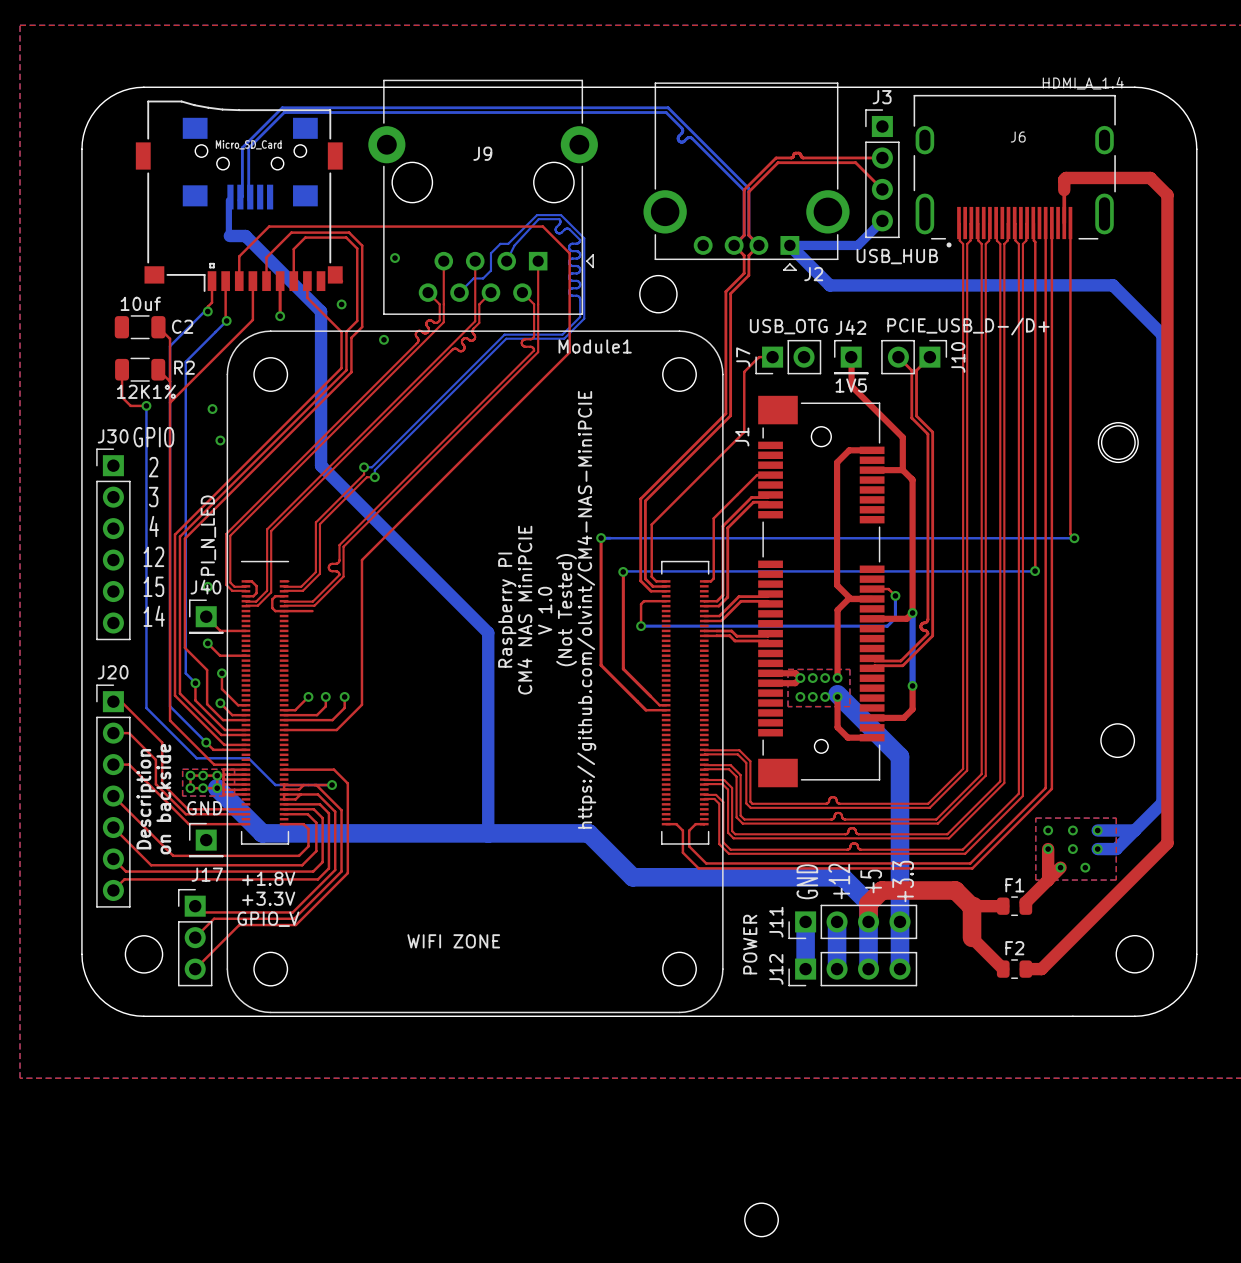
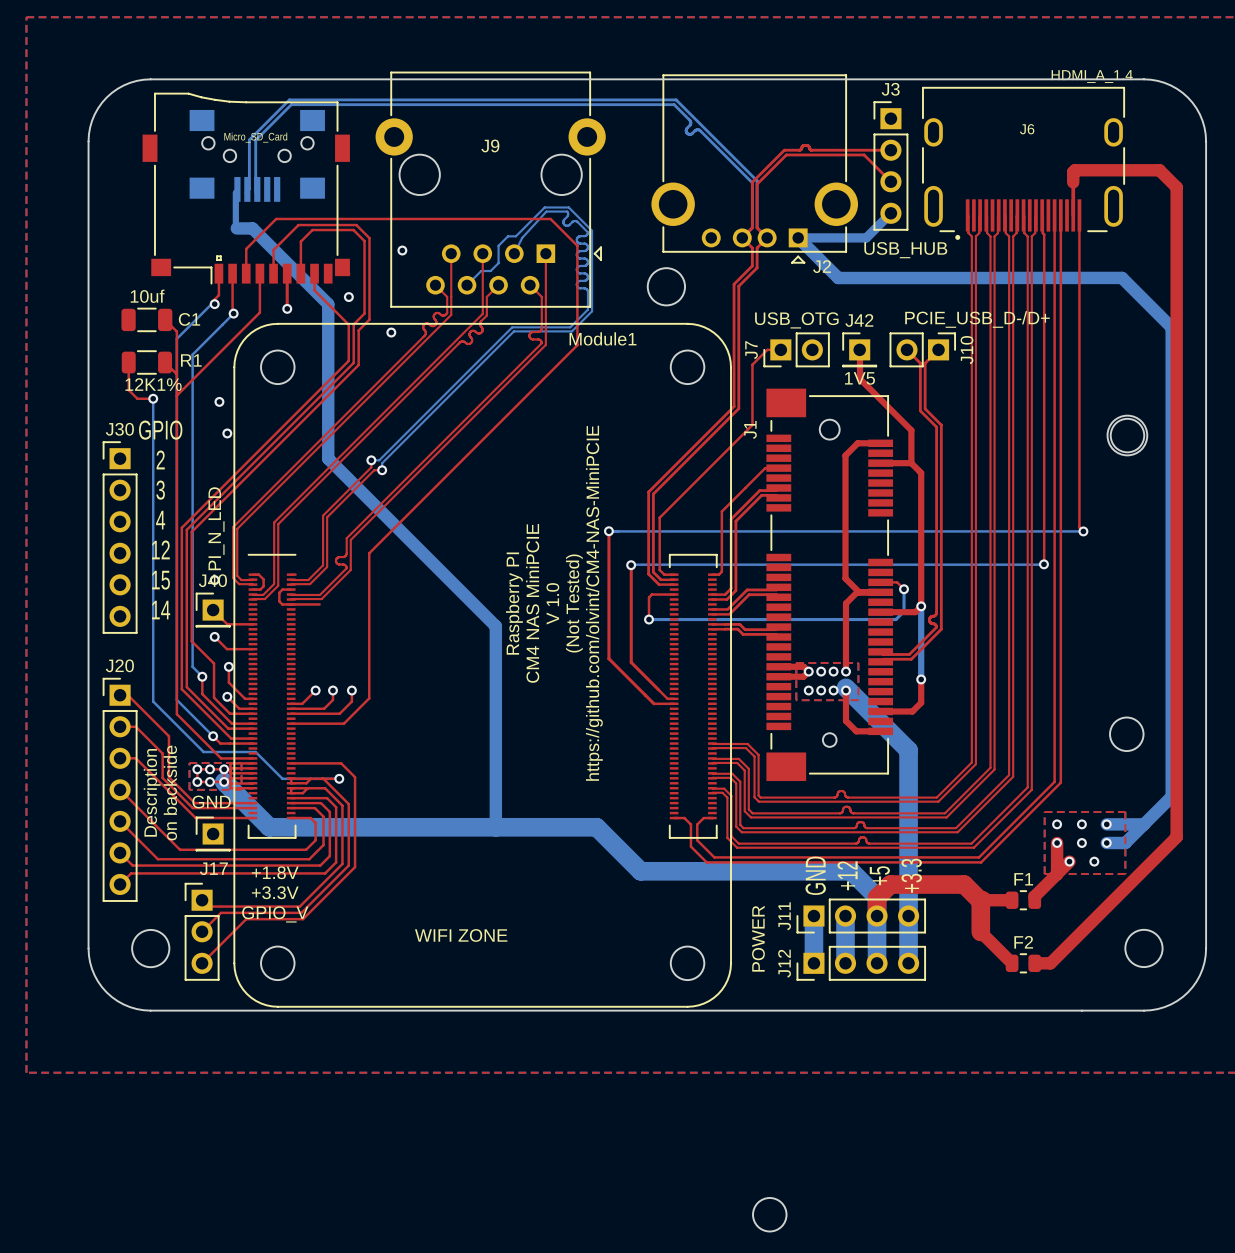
C2 name: C2 (182, 326) -> C1 (189, 319)
R2 name: R2 (184, 367) -> R1 (191, 360)

